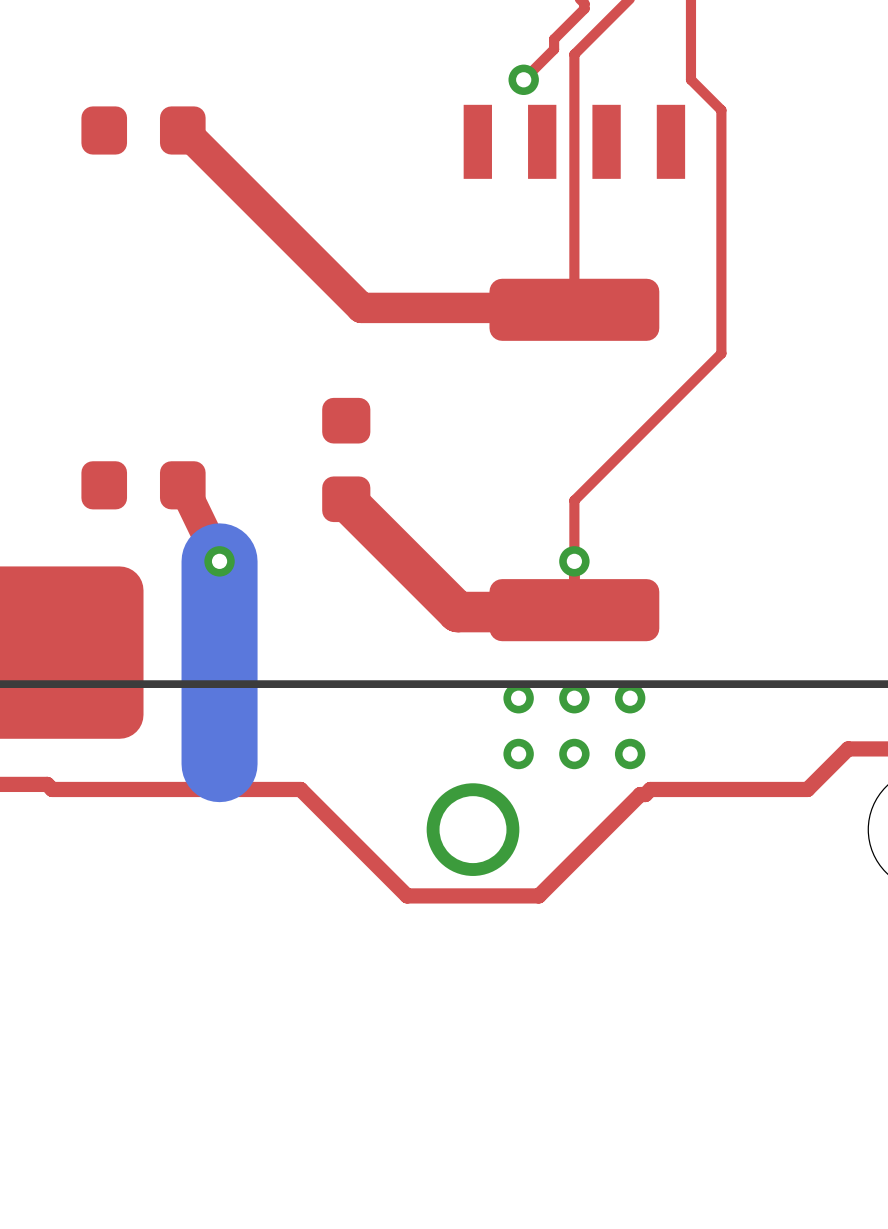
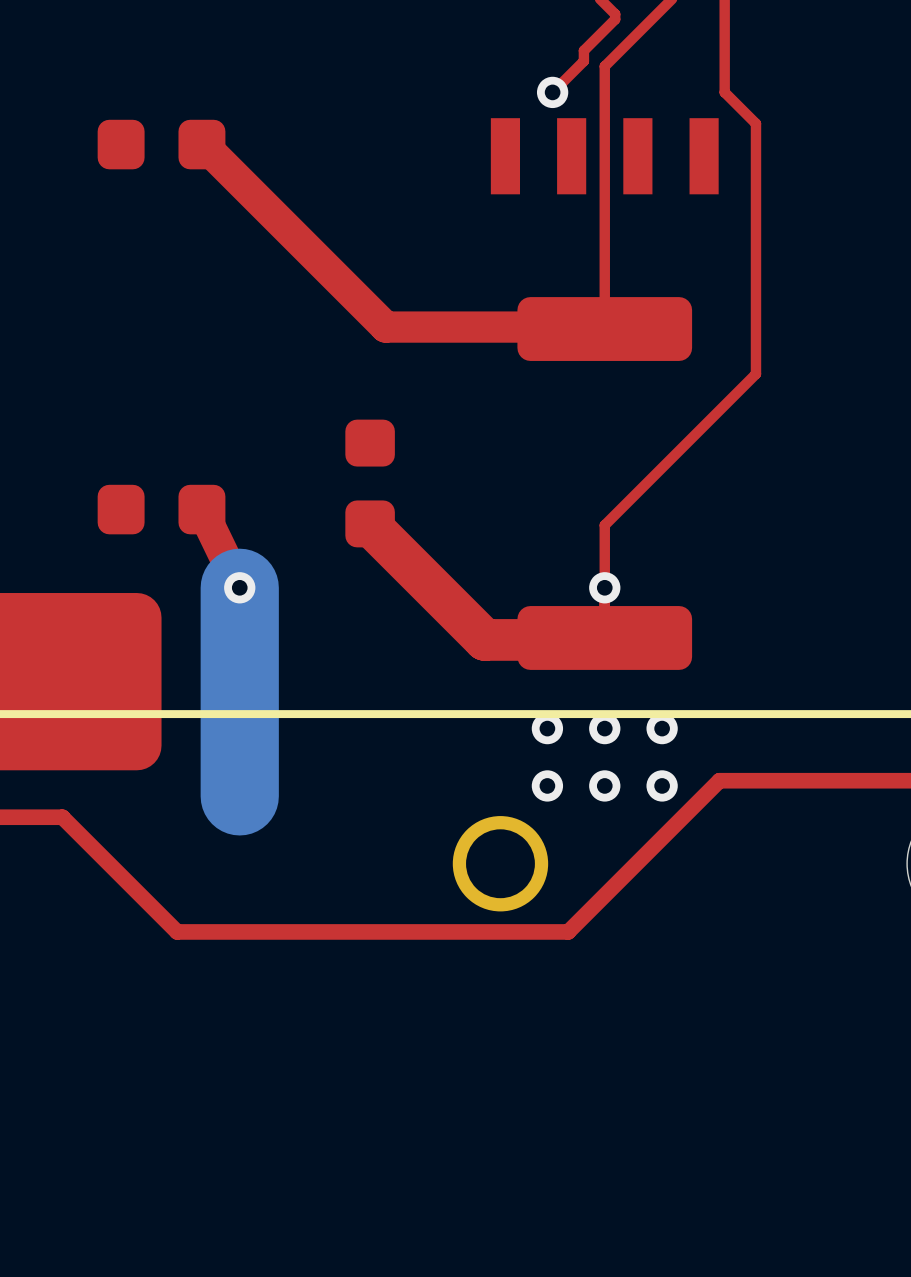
top track: (848, 748) (807, 789) (650, 789) (645, 794) (640, 794) -> (886, 780) (719, 780) (672, 827)
top track: (52, 789) (300, 789) (407, 895) -> (67, 822) (177, 931) (432, 931)

